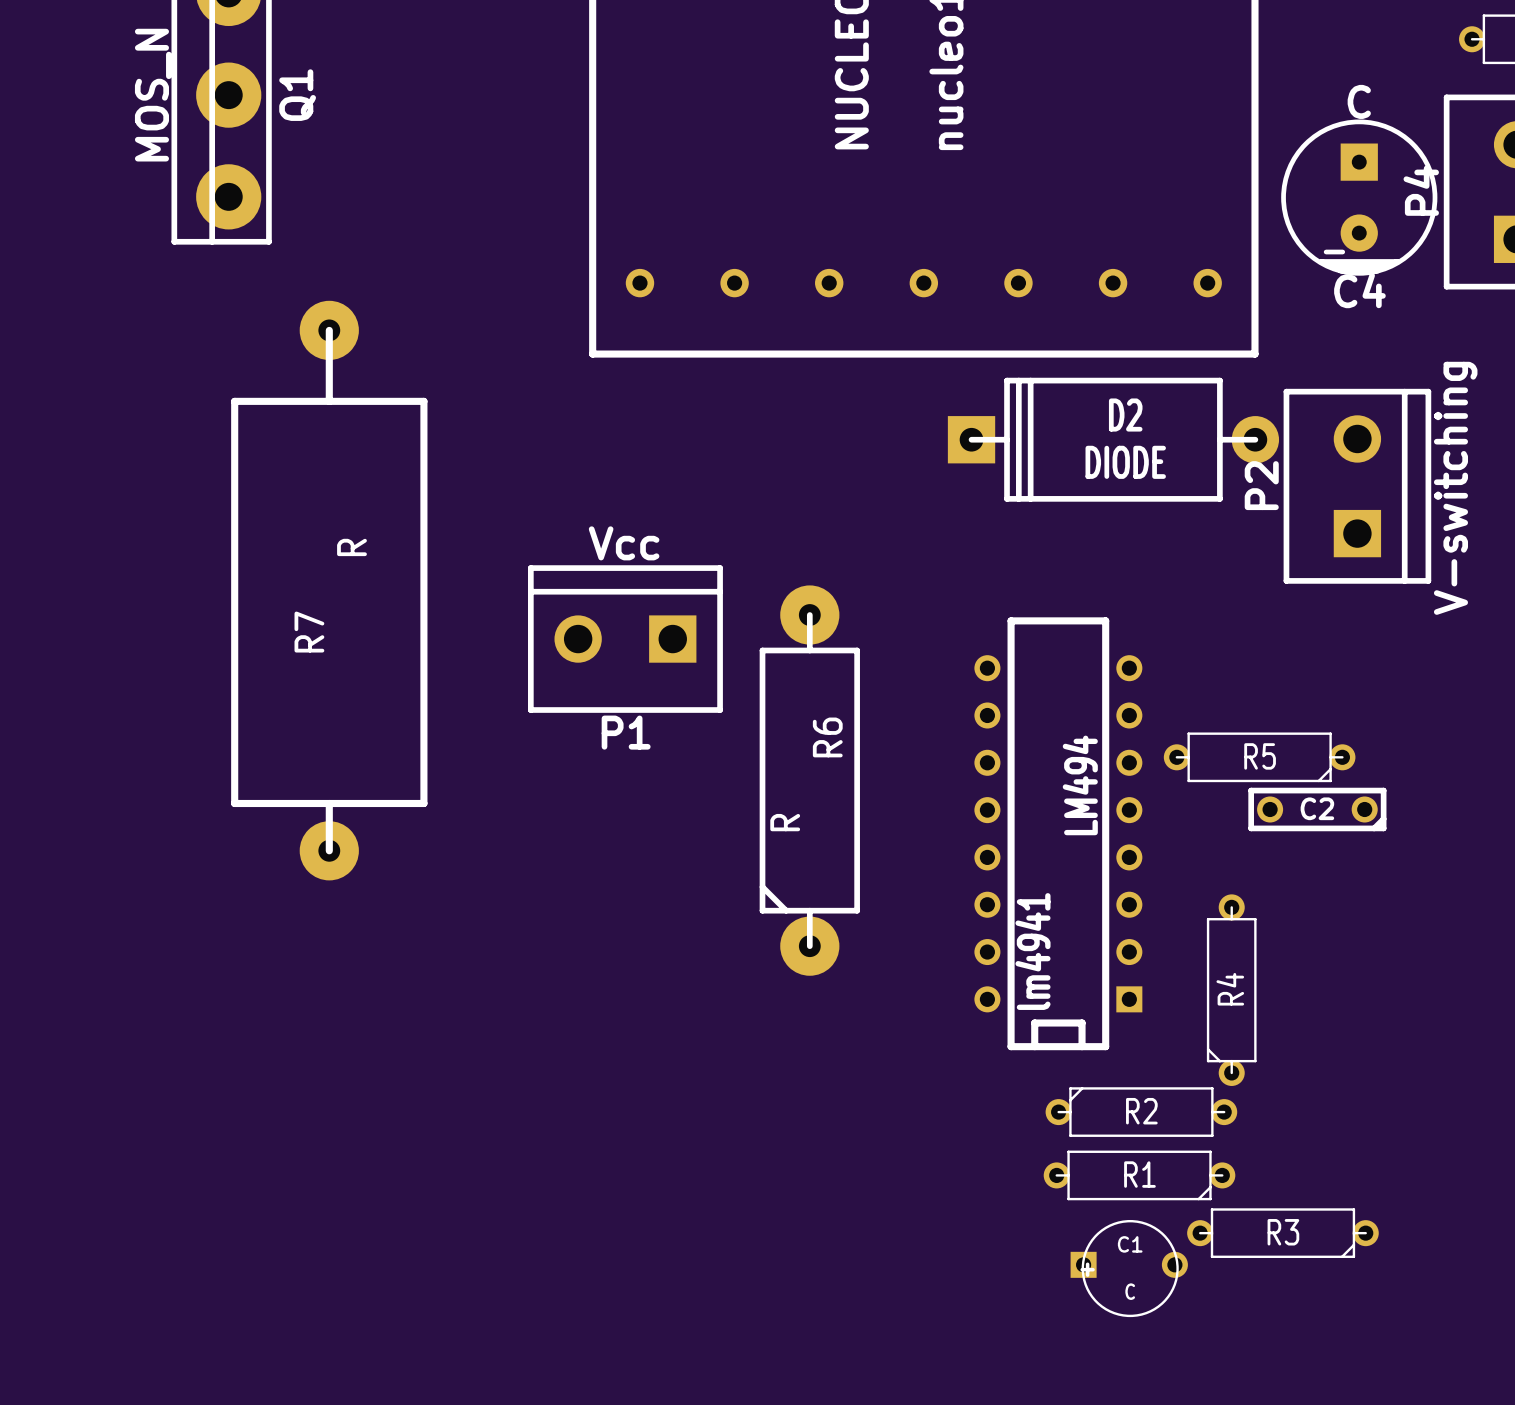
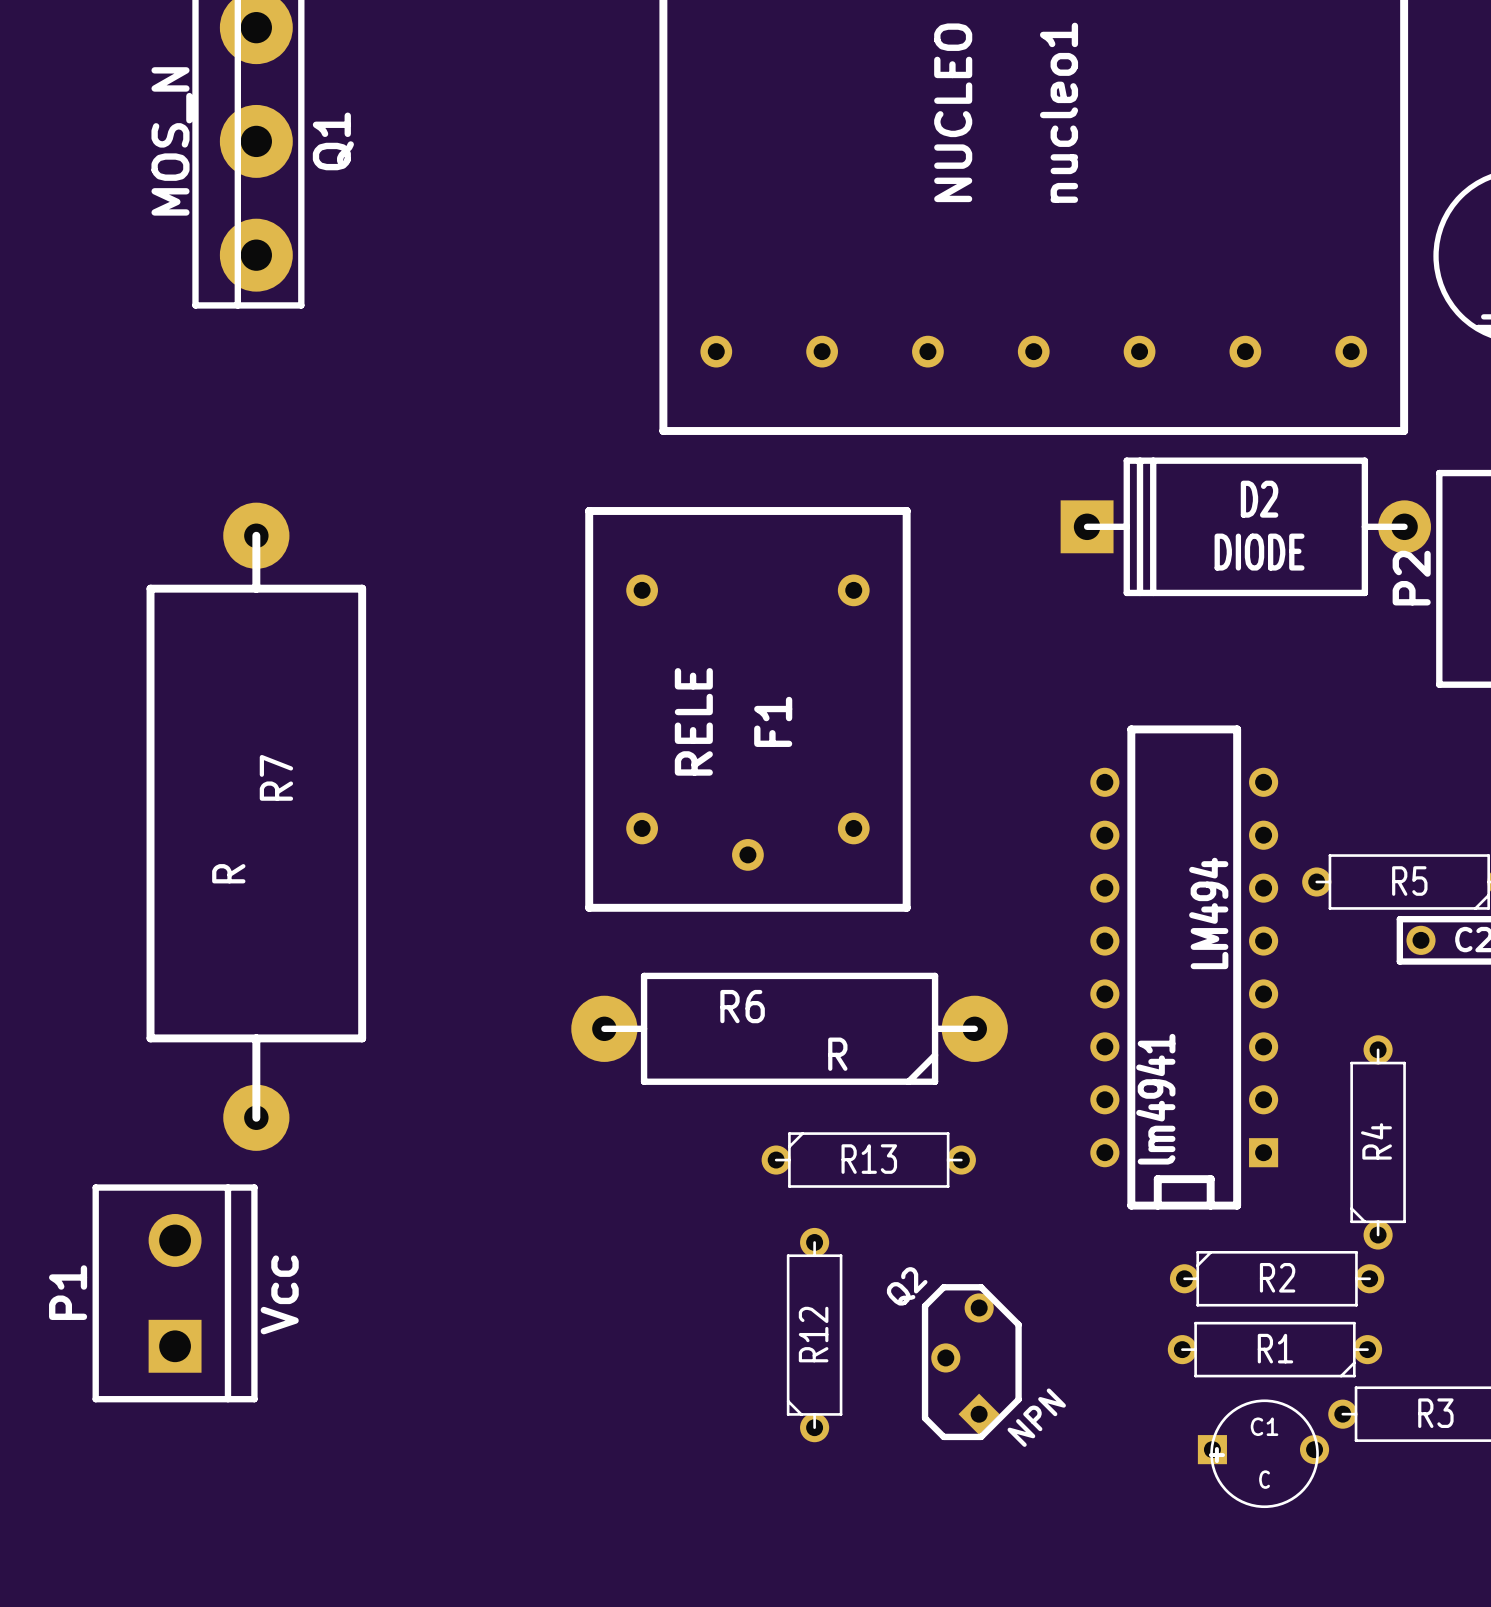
R7 rotation: 0° (329, 590) -> 180° (256, 826)
F1: none -> RELE (747, 709)
P1 rotation: 0° (625, 639) -> 90° clockwise (175, 1293)
P1 position: (625, 639) -> (175, 1293)
R6 rotation: 0° (809, 780) -> 90° counterclockwise (789, 1028)
R13: none -> (868, 1160)
R12: none -> (814, 1335)
Q2: none -> NPN (971, 1362)

